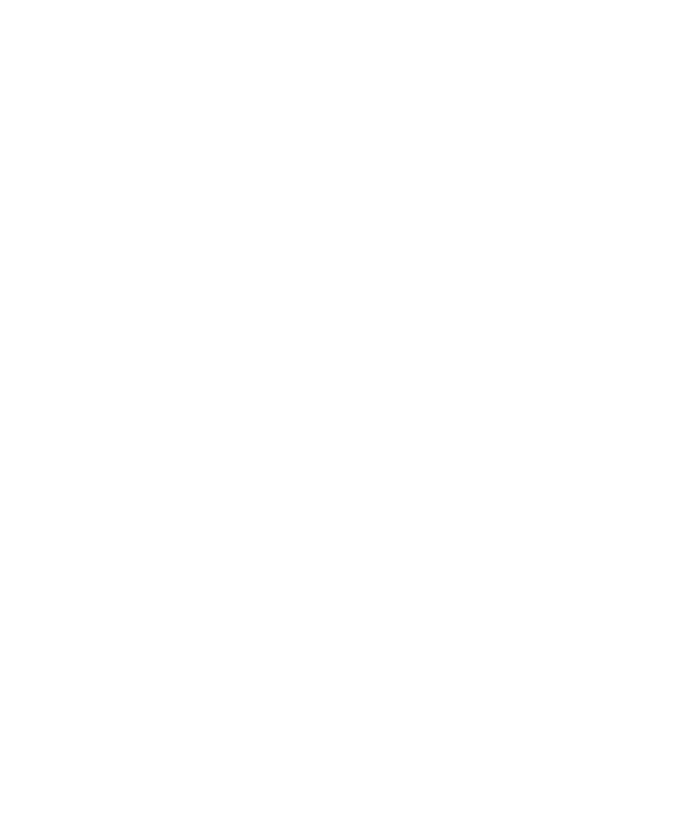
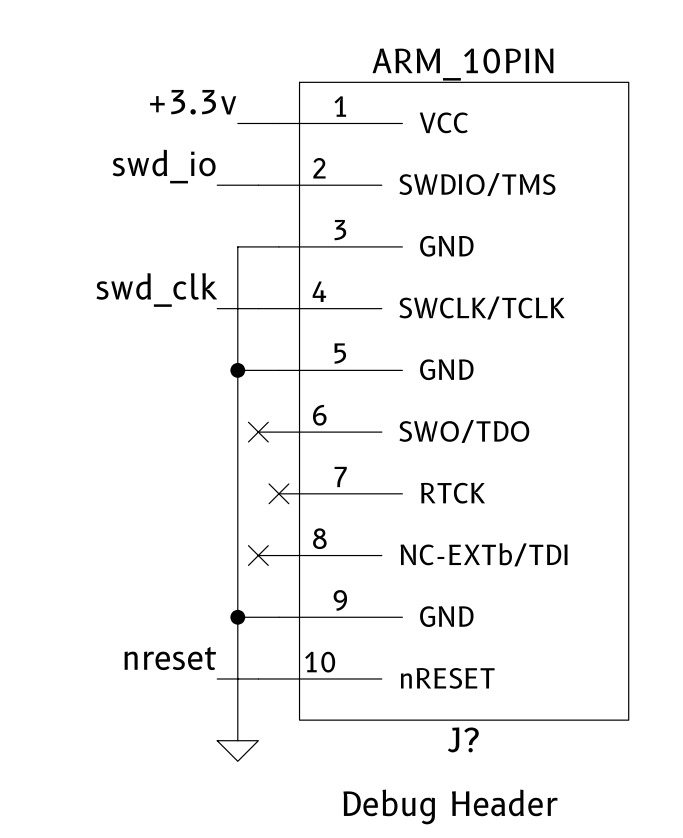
label: none -> +3.3v (193, 102)
wire: none -> (237, 123) (278, 123)
label: none -> swd_io (164, 166)
wire: none -> (217, 185) (258, 185)
wire: none -> (278, 246) (237, 246) (237, 740)
label: none -> swd_clk (156, 290)
wire: none -> (217, 308) (258, 308)
wire: none -> (237, 370) (278, 370)
junction: none -> (237, 370)
J?: none -> ARM_10PIN (443, 401)
no-connect mark: none -> (258, 432)
no-connect mark: none -> (278, 493)
no-connect mark: none -> (258, 555)
wire: none -> (237, 617) (278, 617)
junction: none -> (237, 617)
label: none -> nreset (170, 658)
wire: none -> (217, 678) (258, 678)
power symbol: none -> (237, 751)
text: none -> Debug Header (450, 806)

